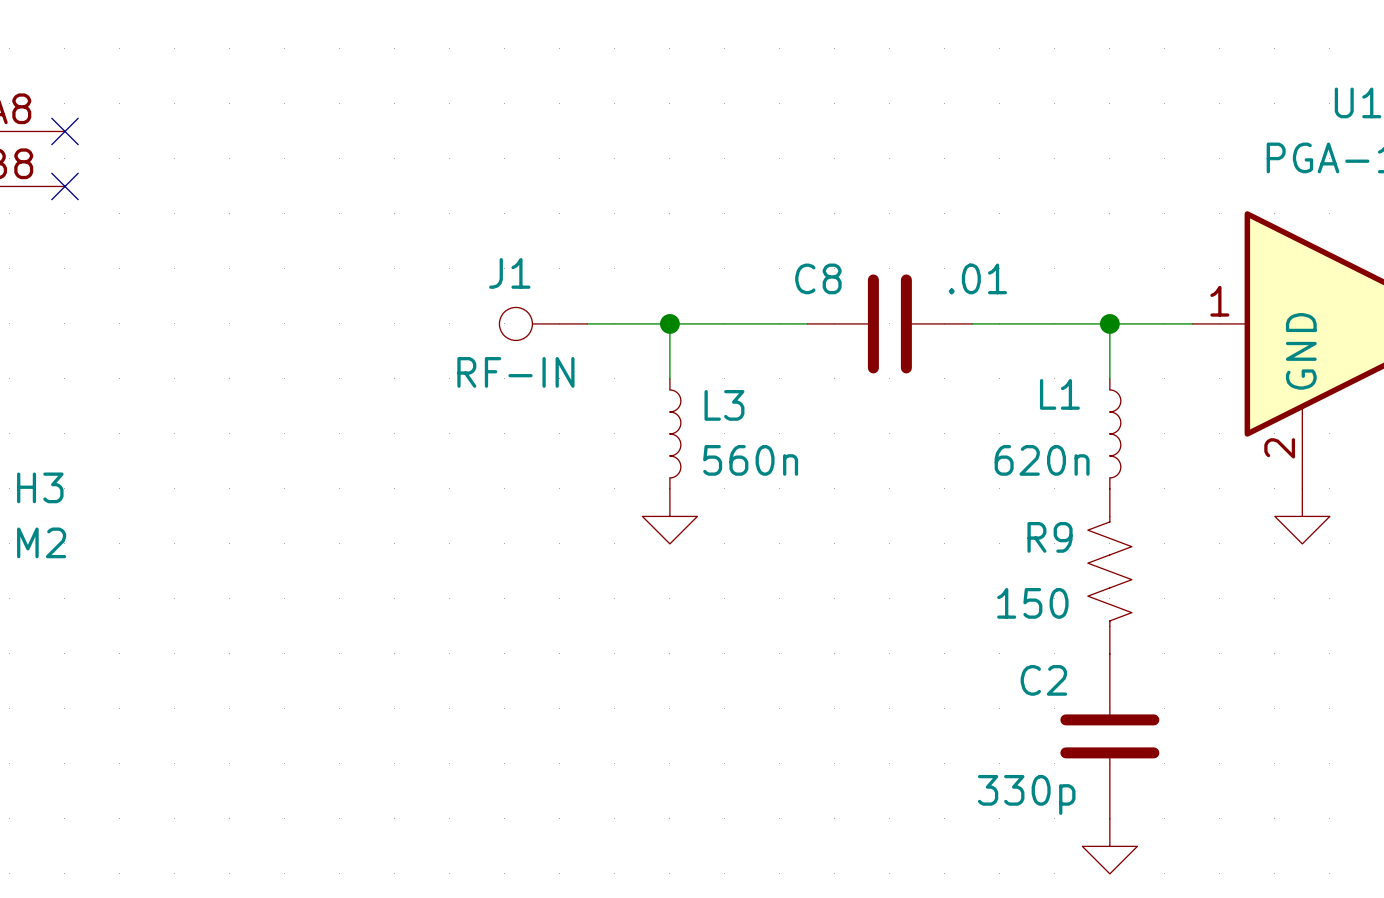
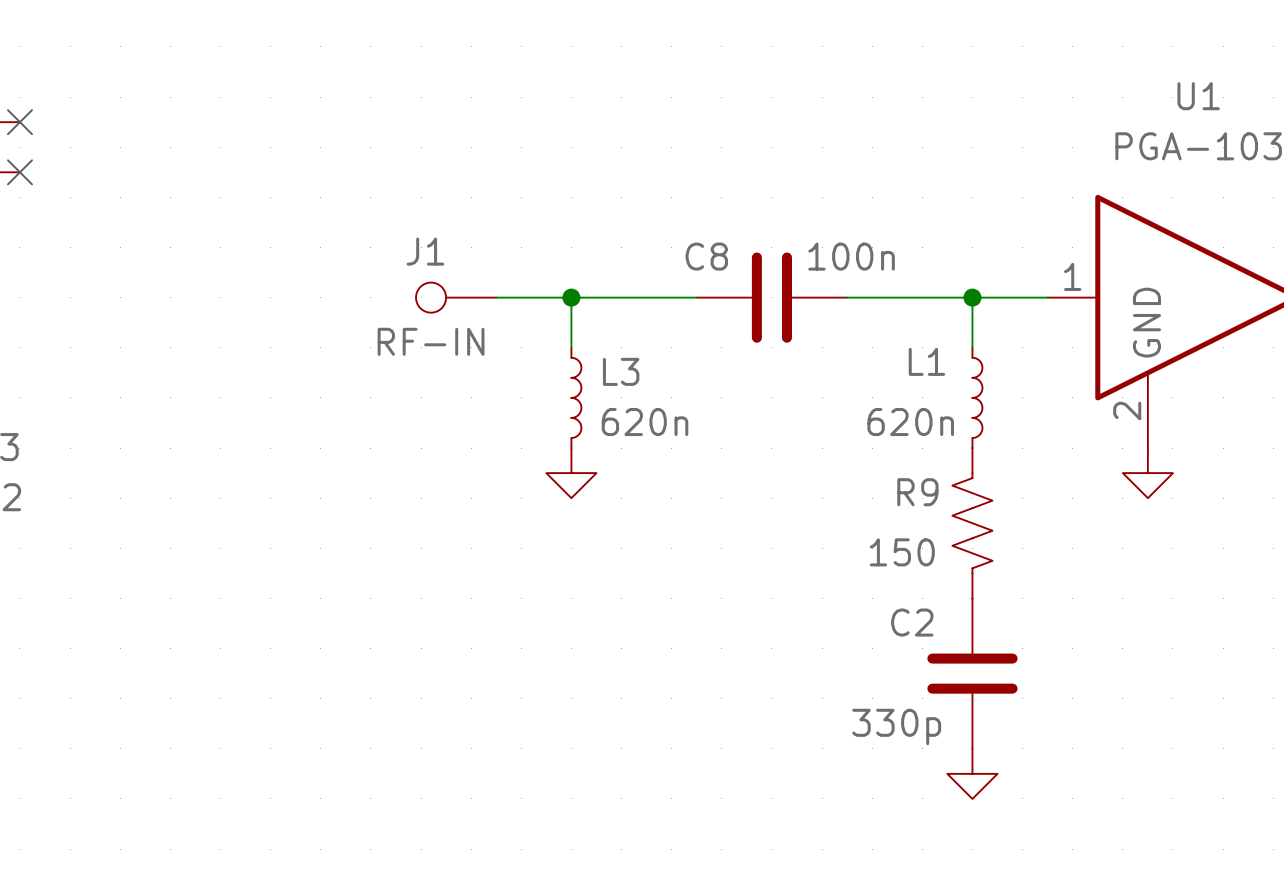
C8 value: .01 (977, 278) -> 100n (851, 256)
L3 value: 560n (750, 460) -> 620n (645, 422)

